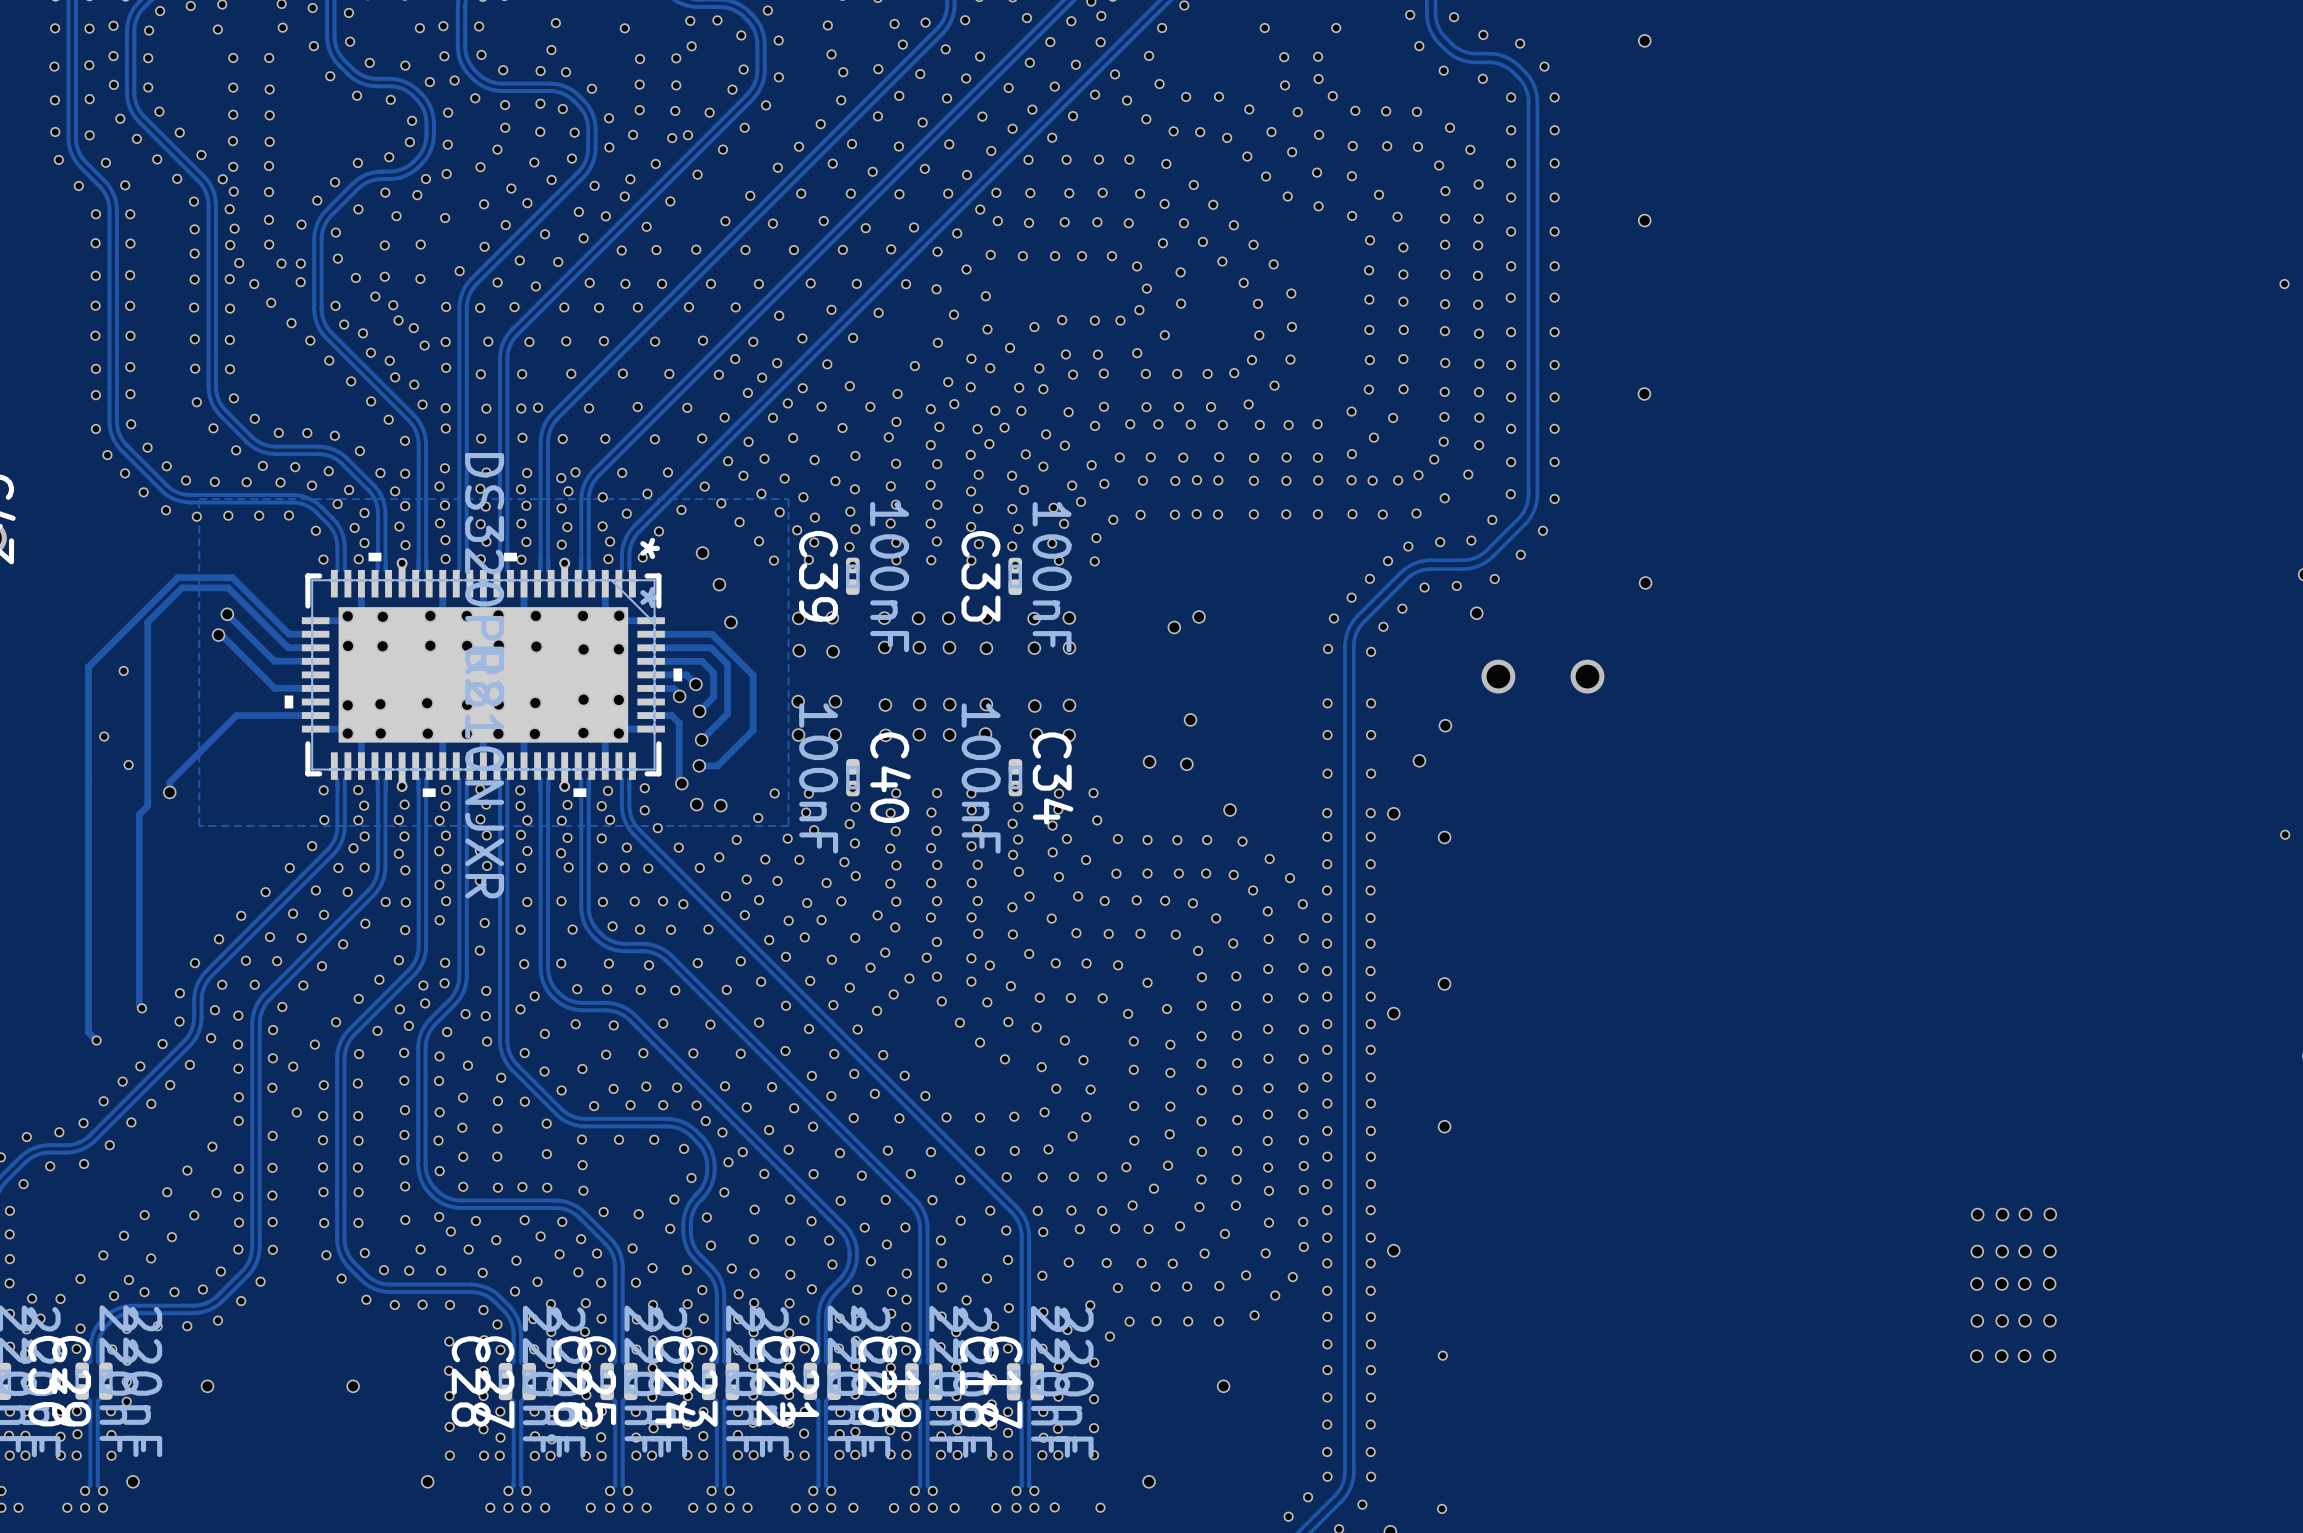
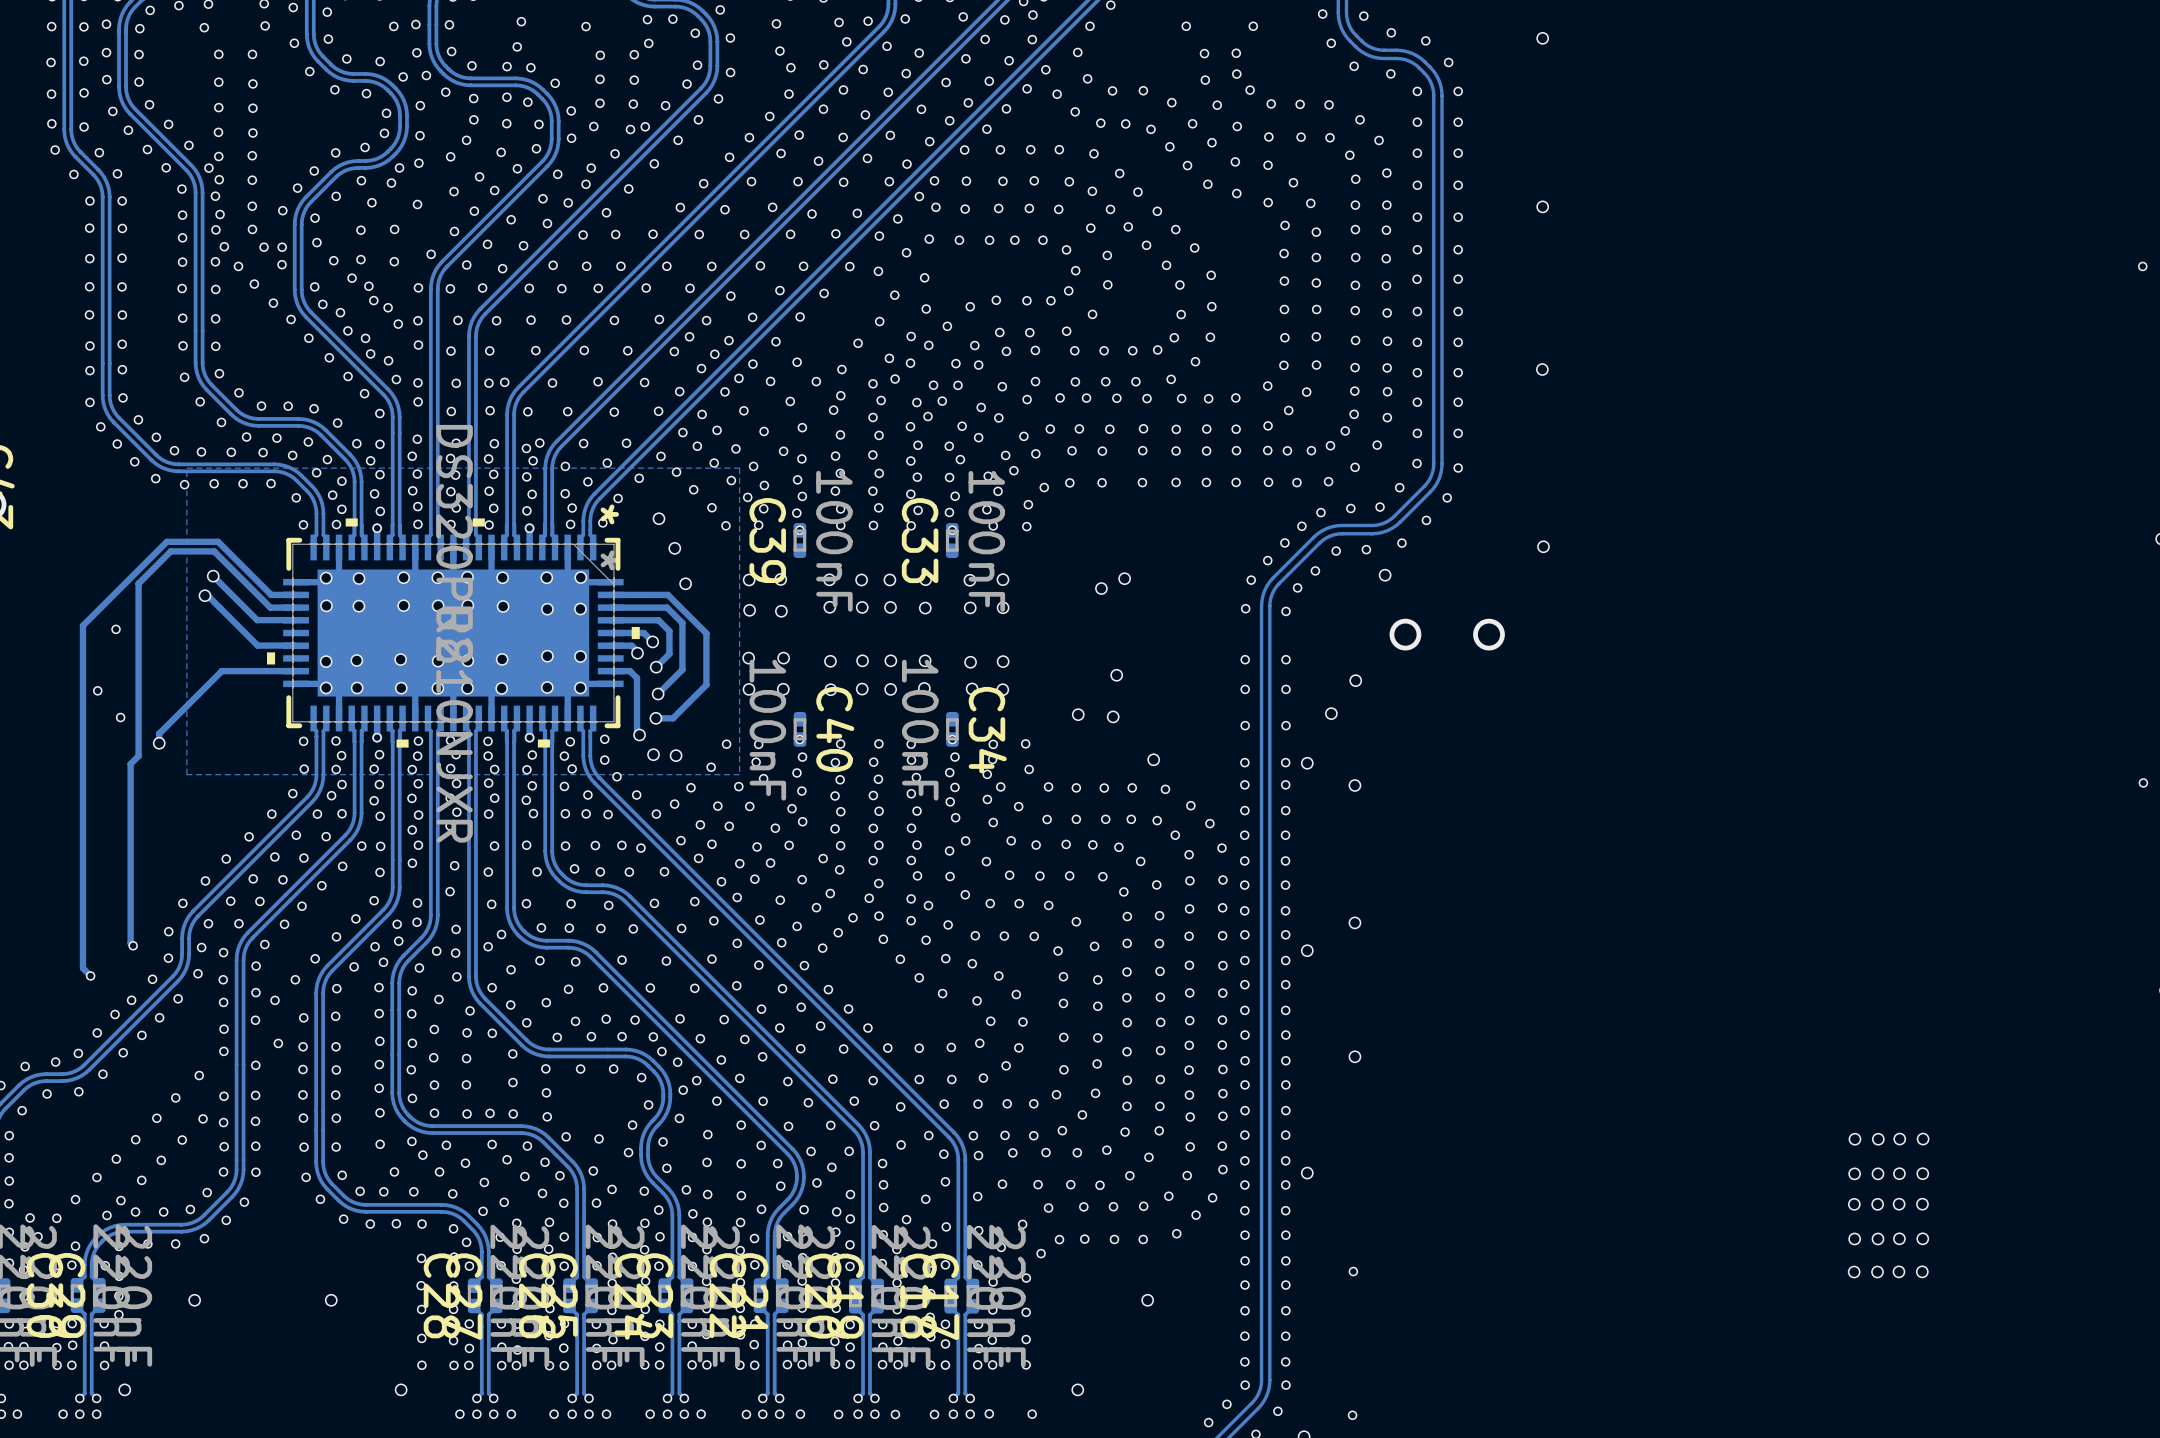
via: (1196, 480) -> none
via: (1196, 514) -> none

